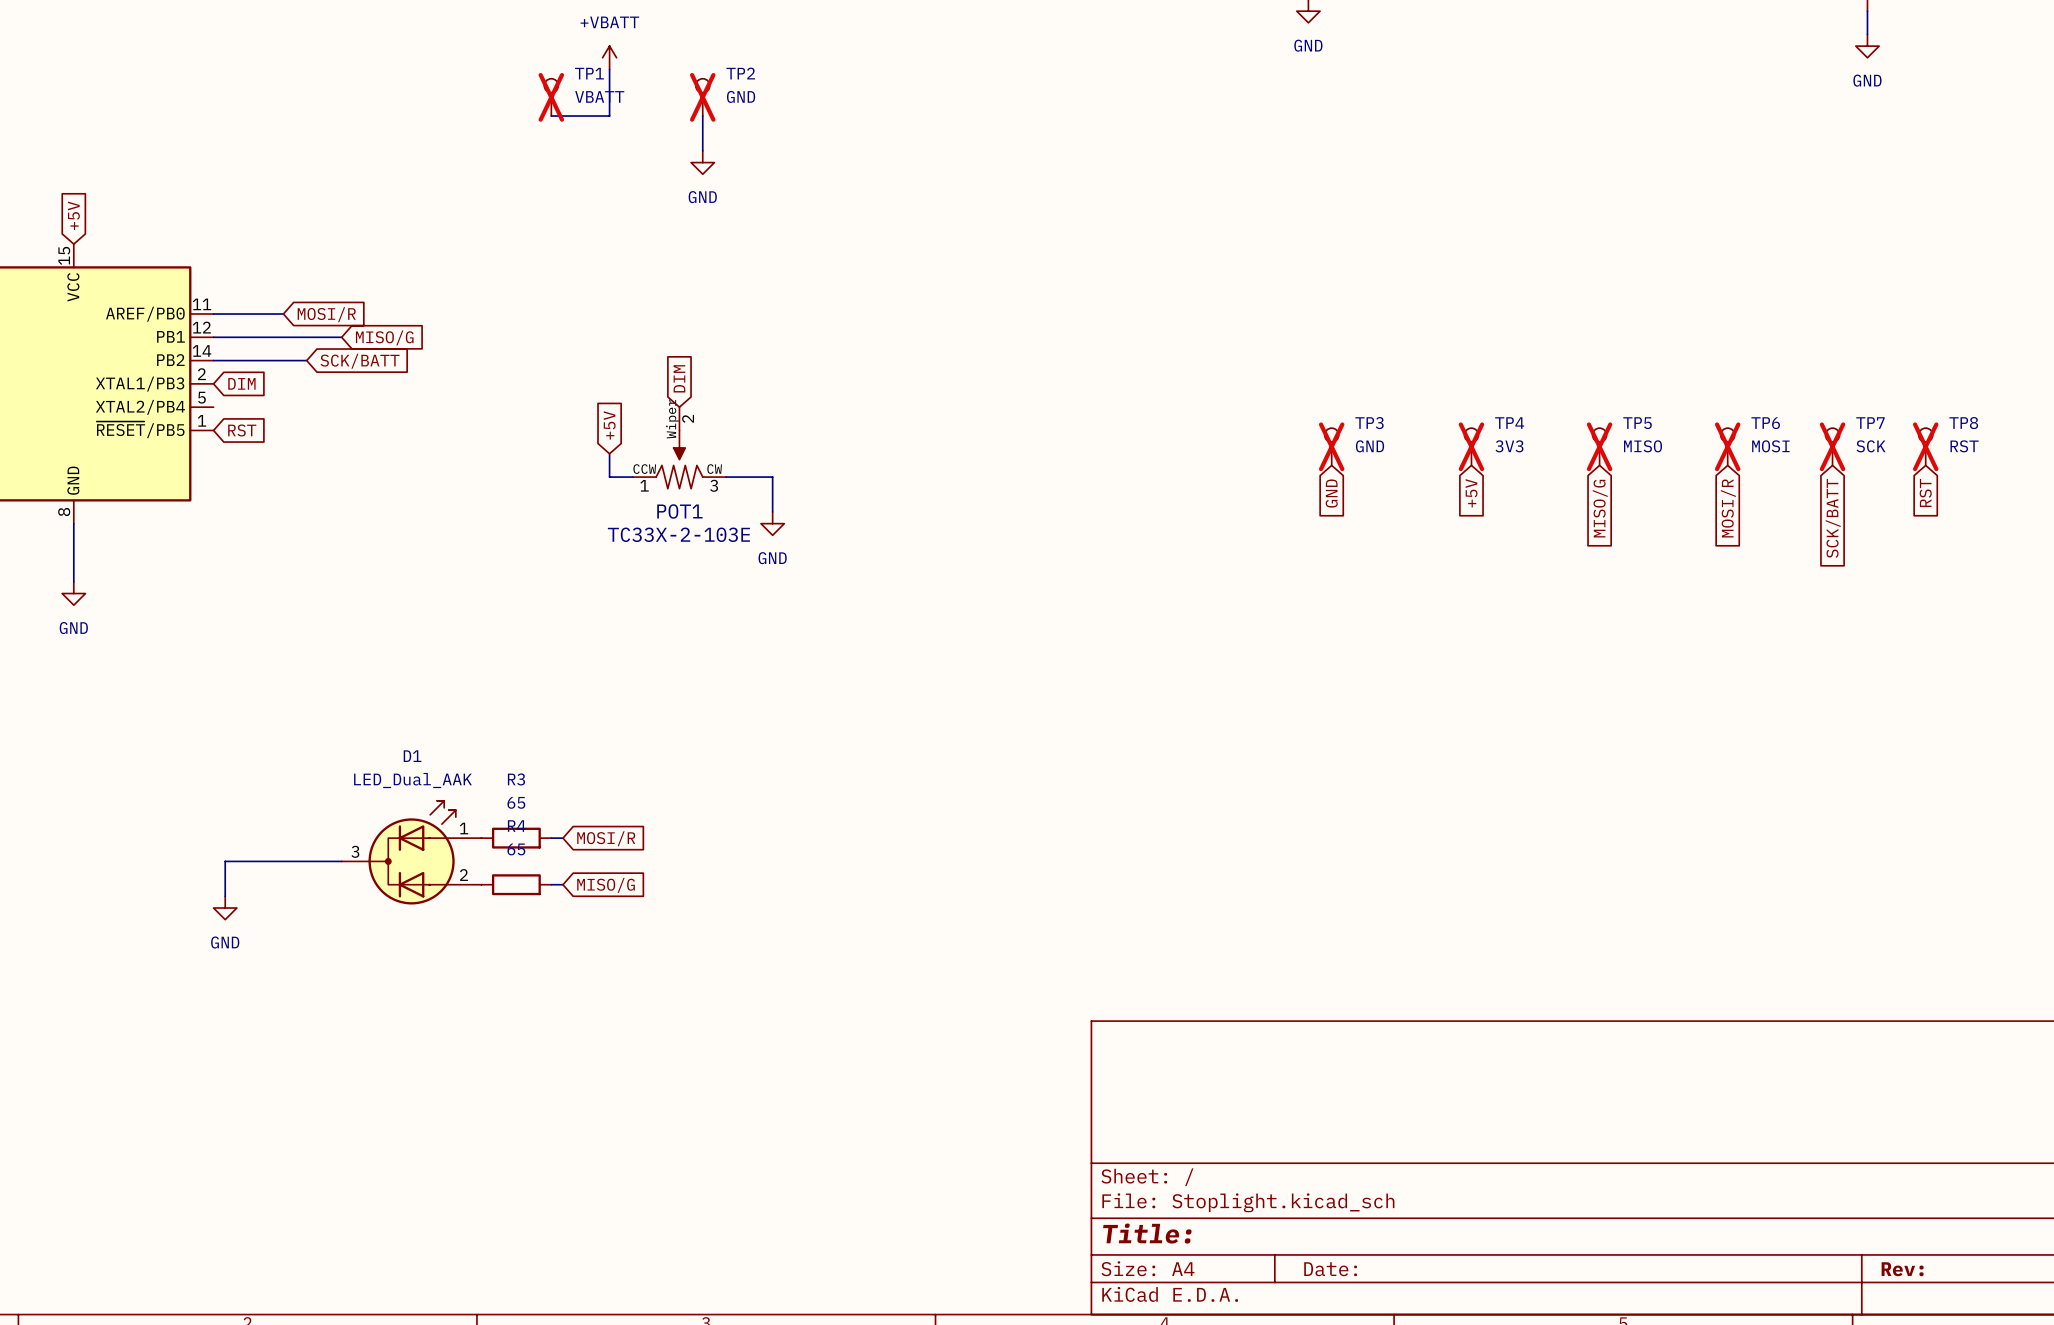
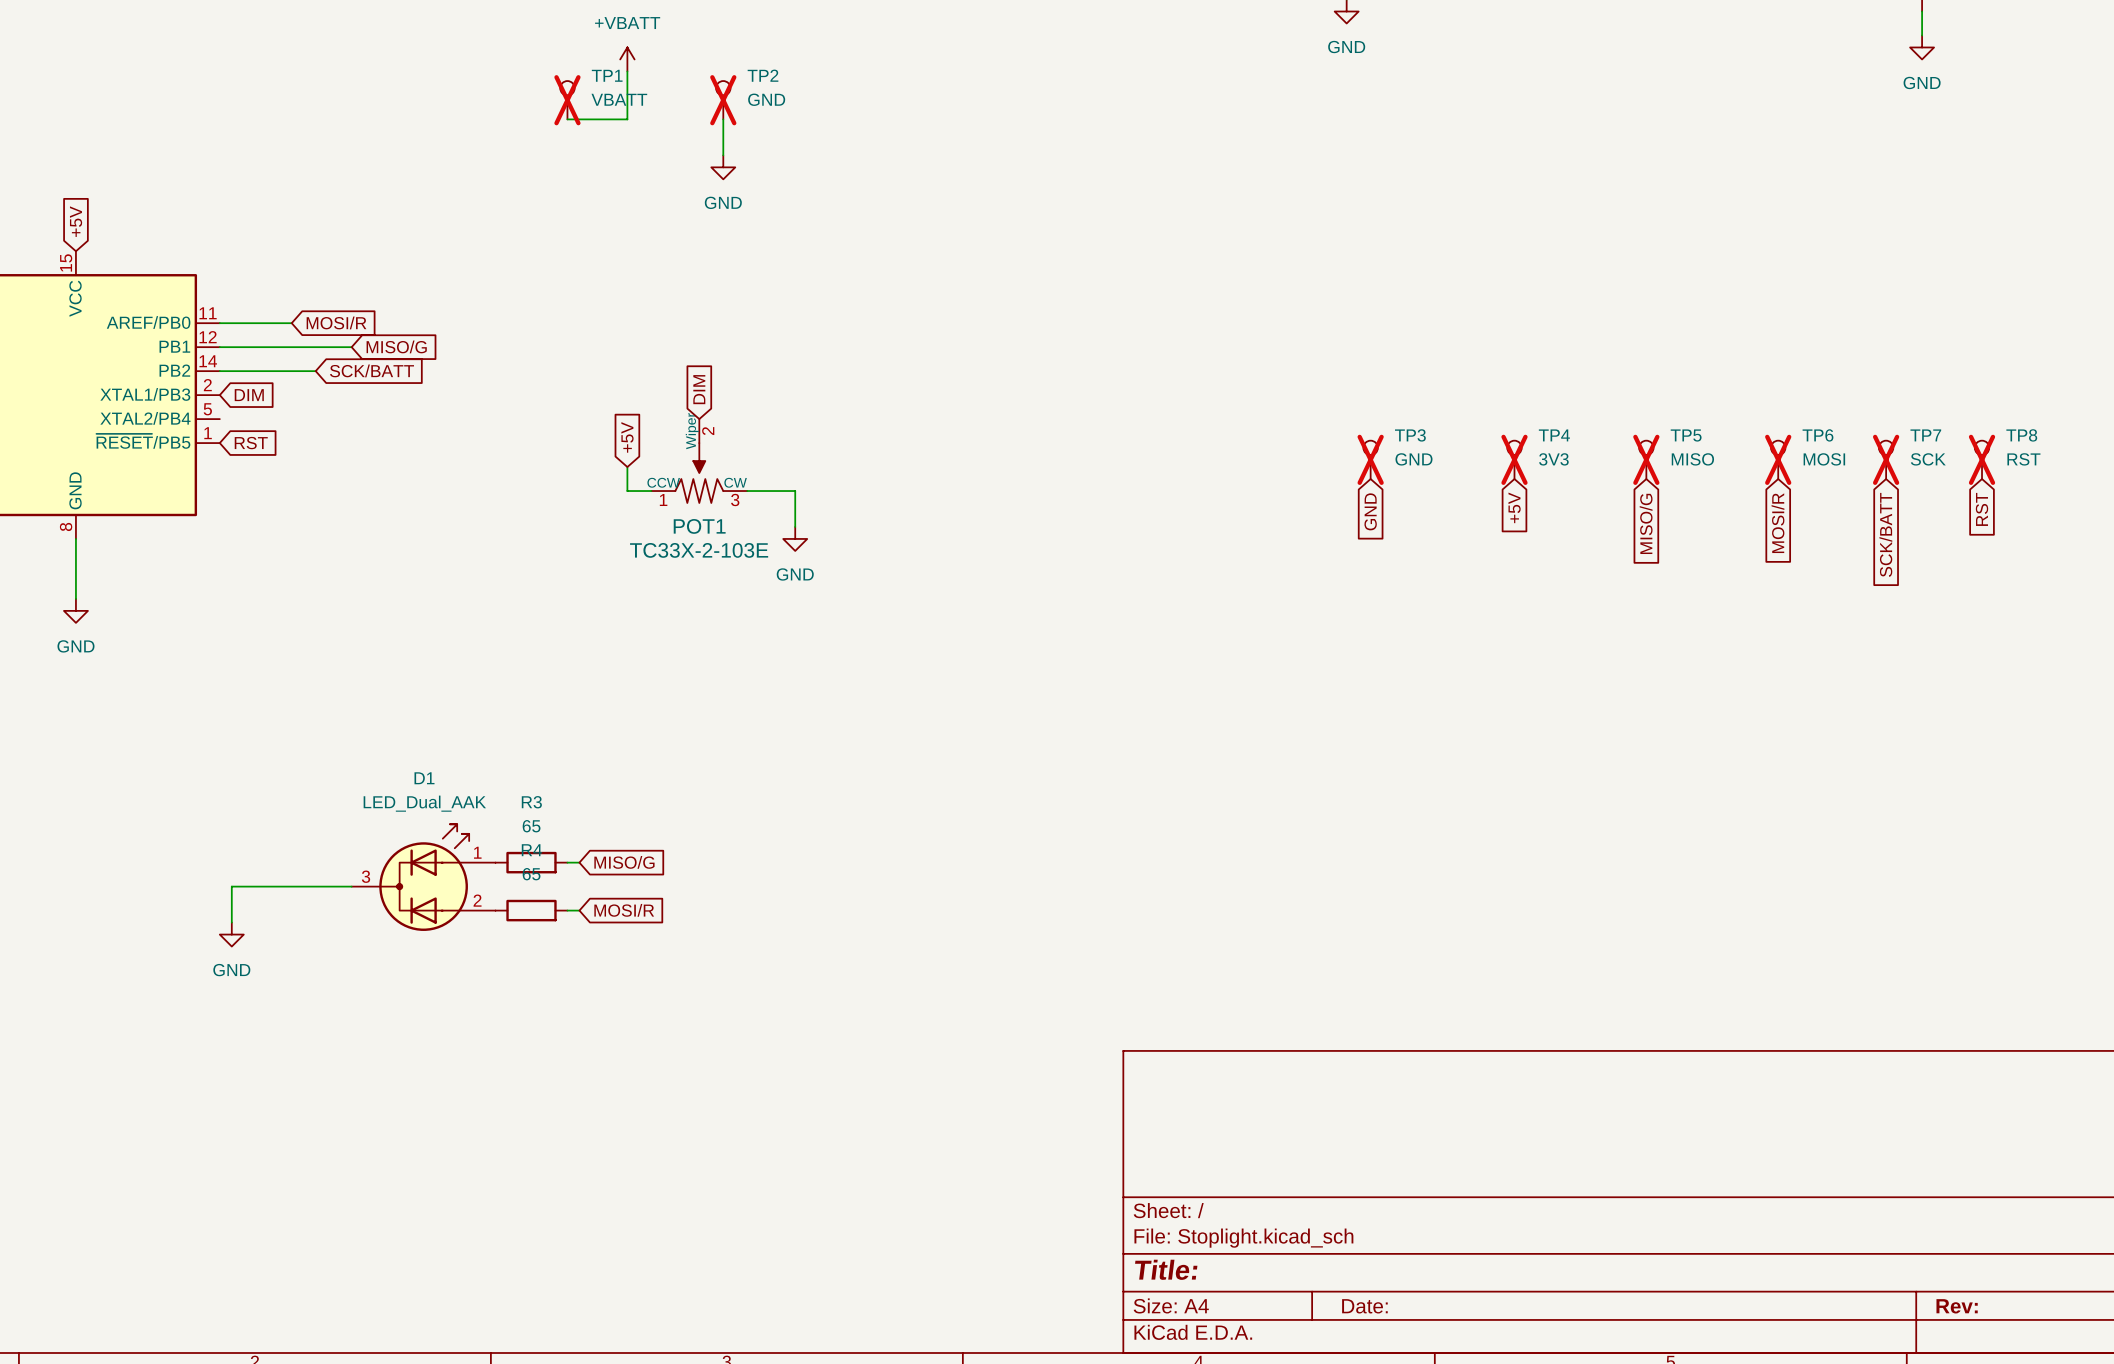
global label: MOSI/R (606, 838) -> MISO/G (624, 862)
global label: MISO/G (606, 885) -> MOSI/R (624, 910)

